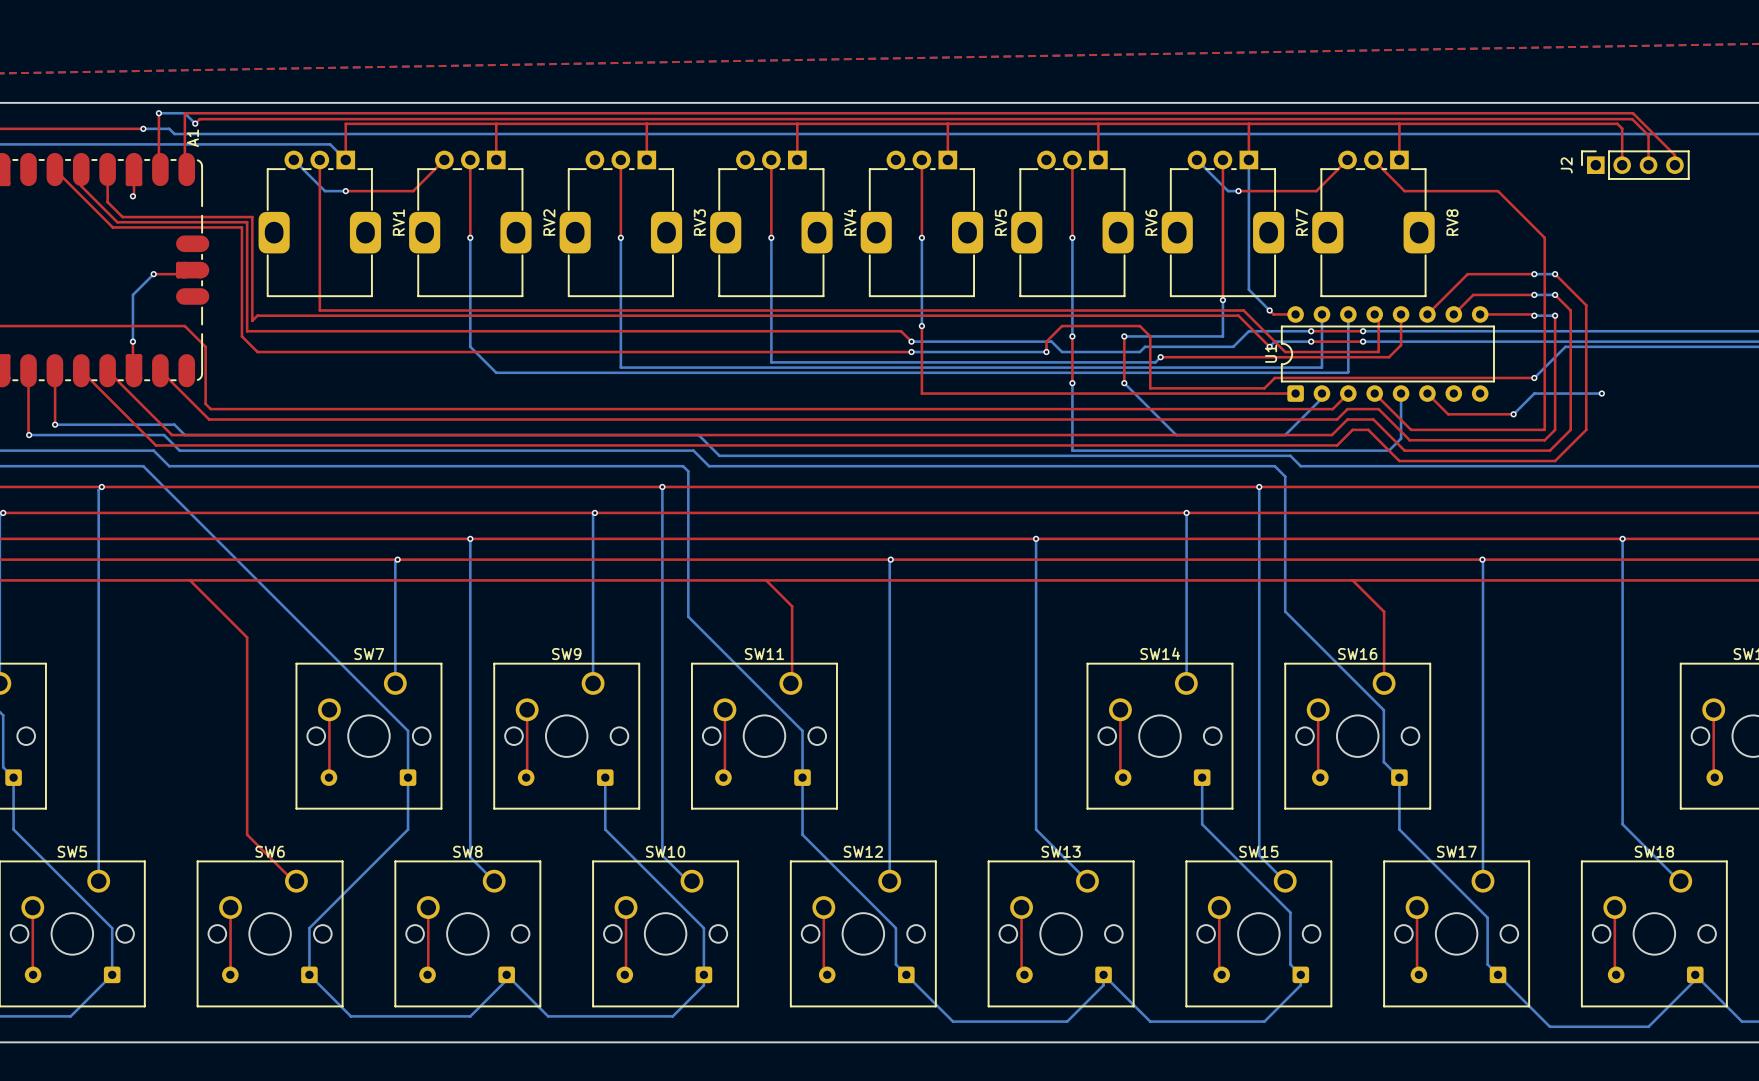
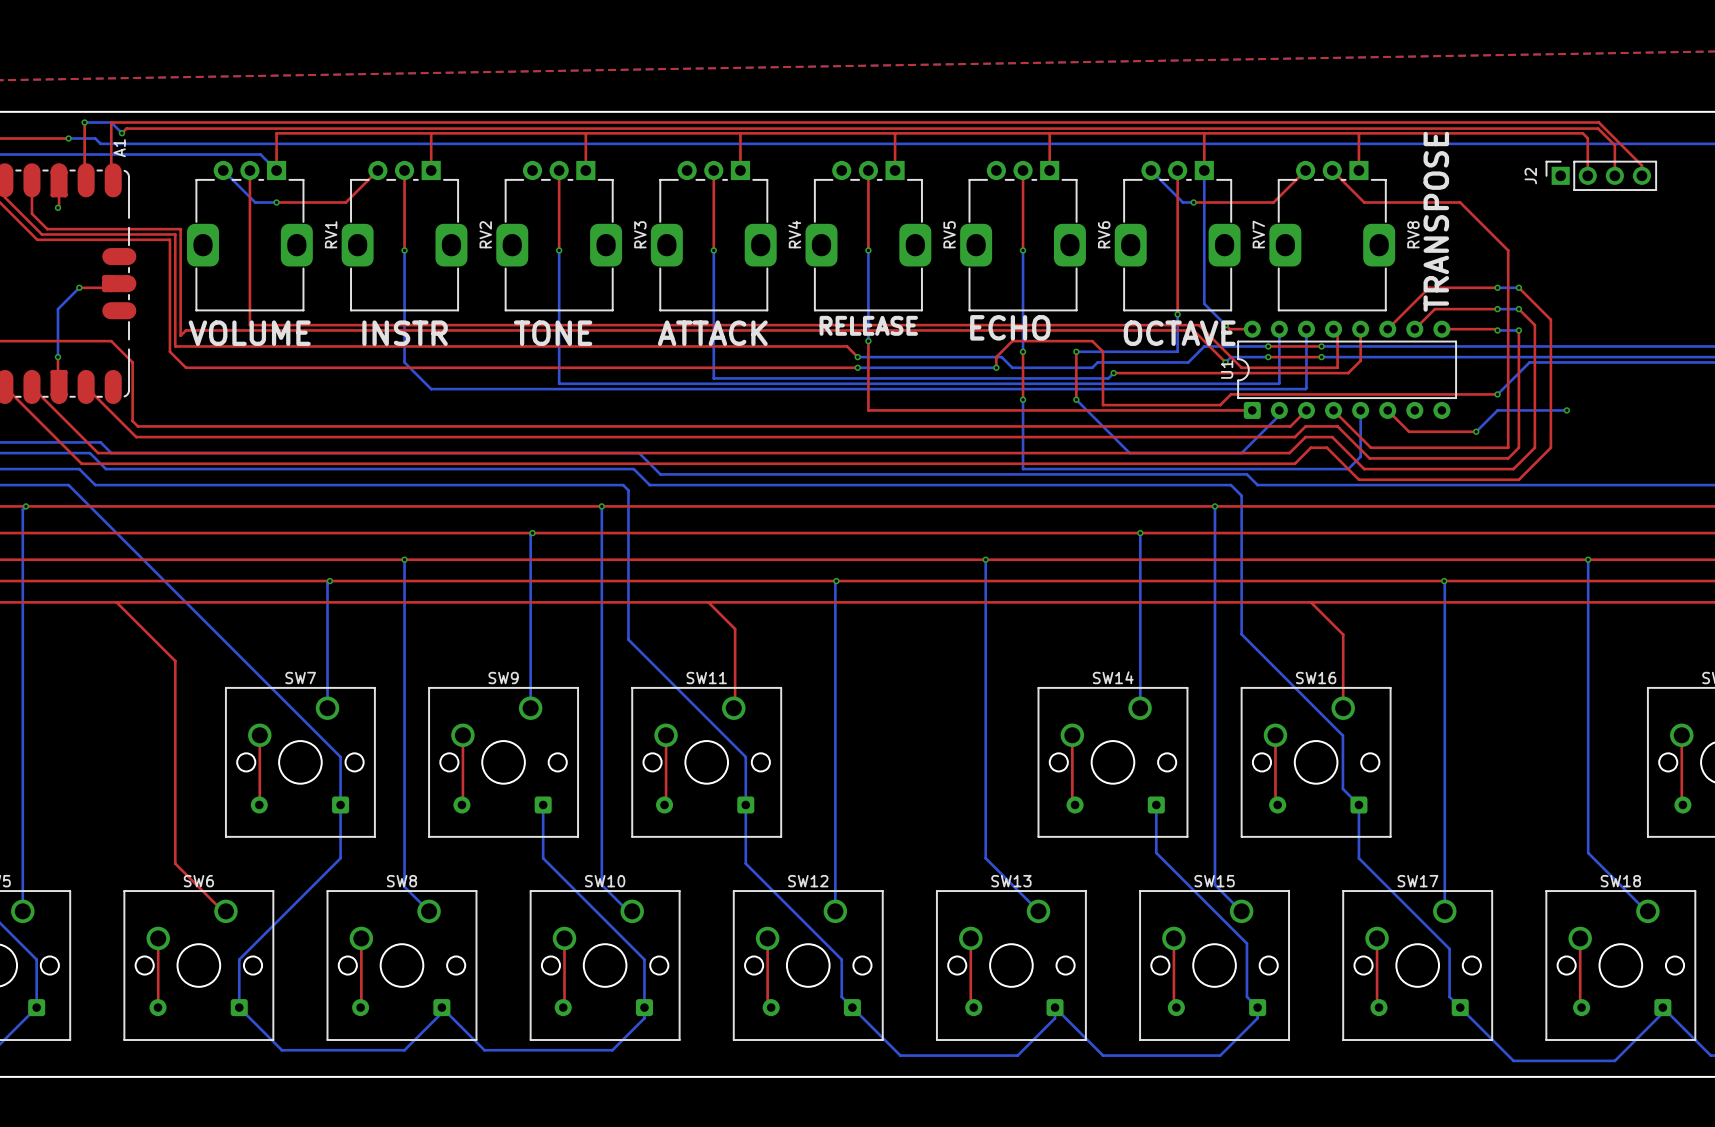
text: none -> TRANSPOSE (1436, 221)
text: none -> RELEASE (868, 325)
text: none -> ECHO (1010, 327)
text: none -> VOLUME (249, 333)
text: none -> INSTR (405, 333)
text: none -> TONE (553, 333)
text: none -> ATTACK (712, 333)
text: none -> OCTAVE (1179, 333)

